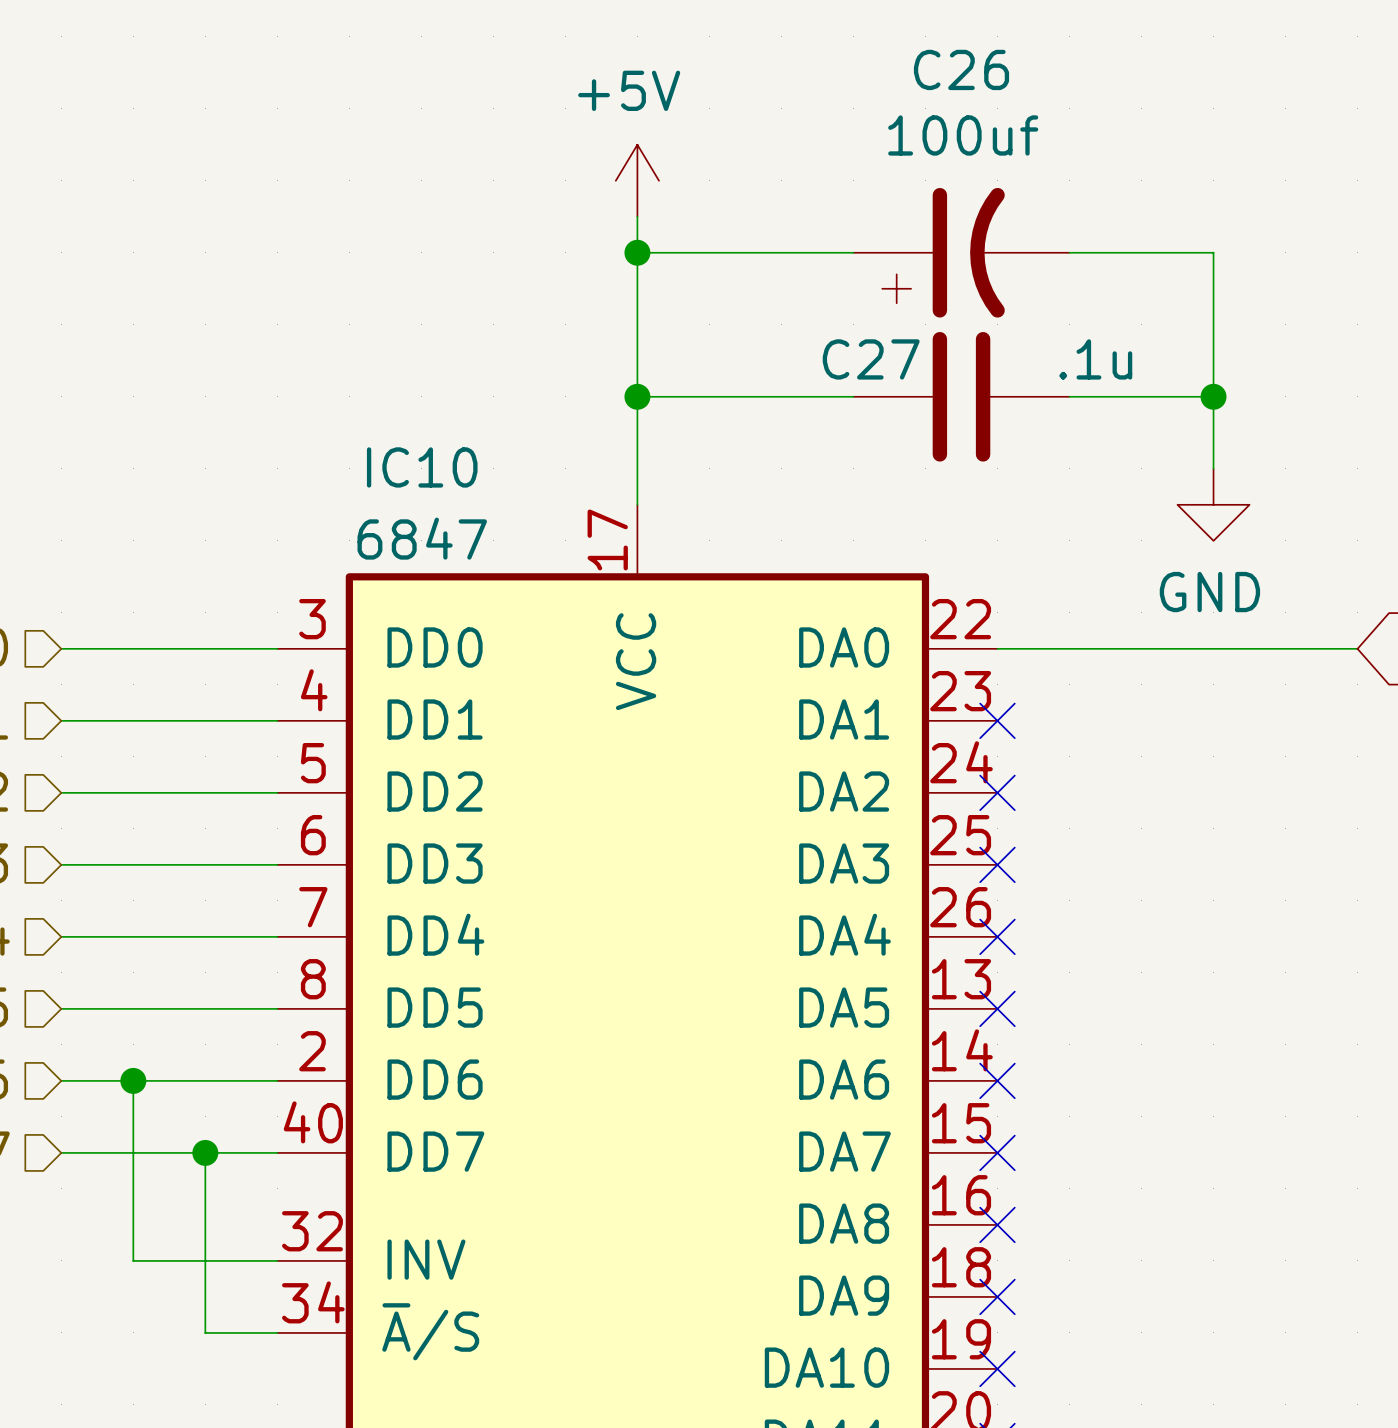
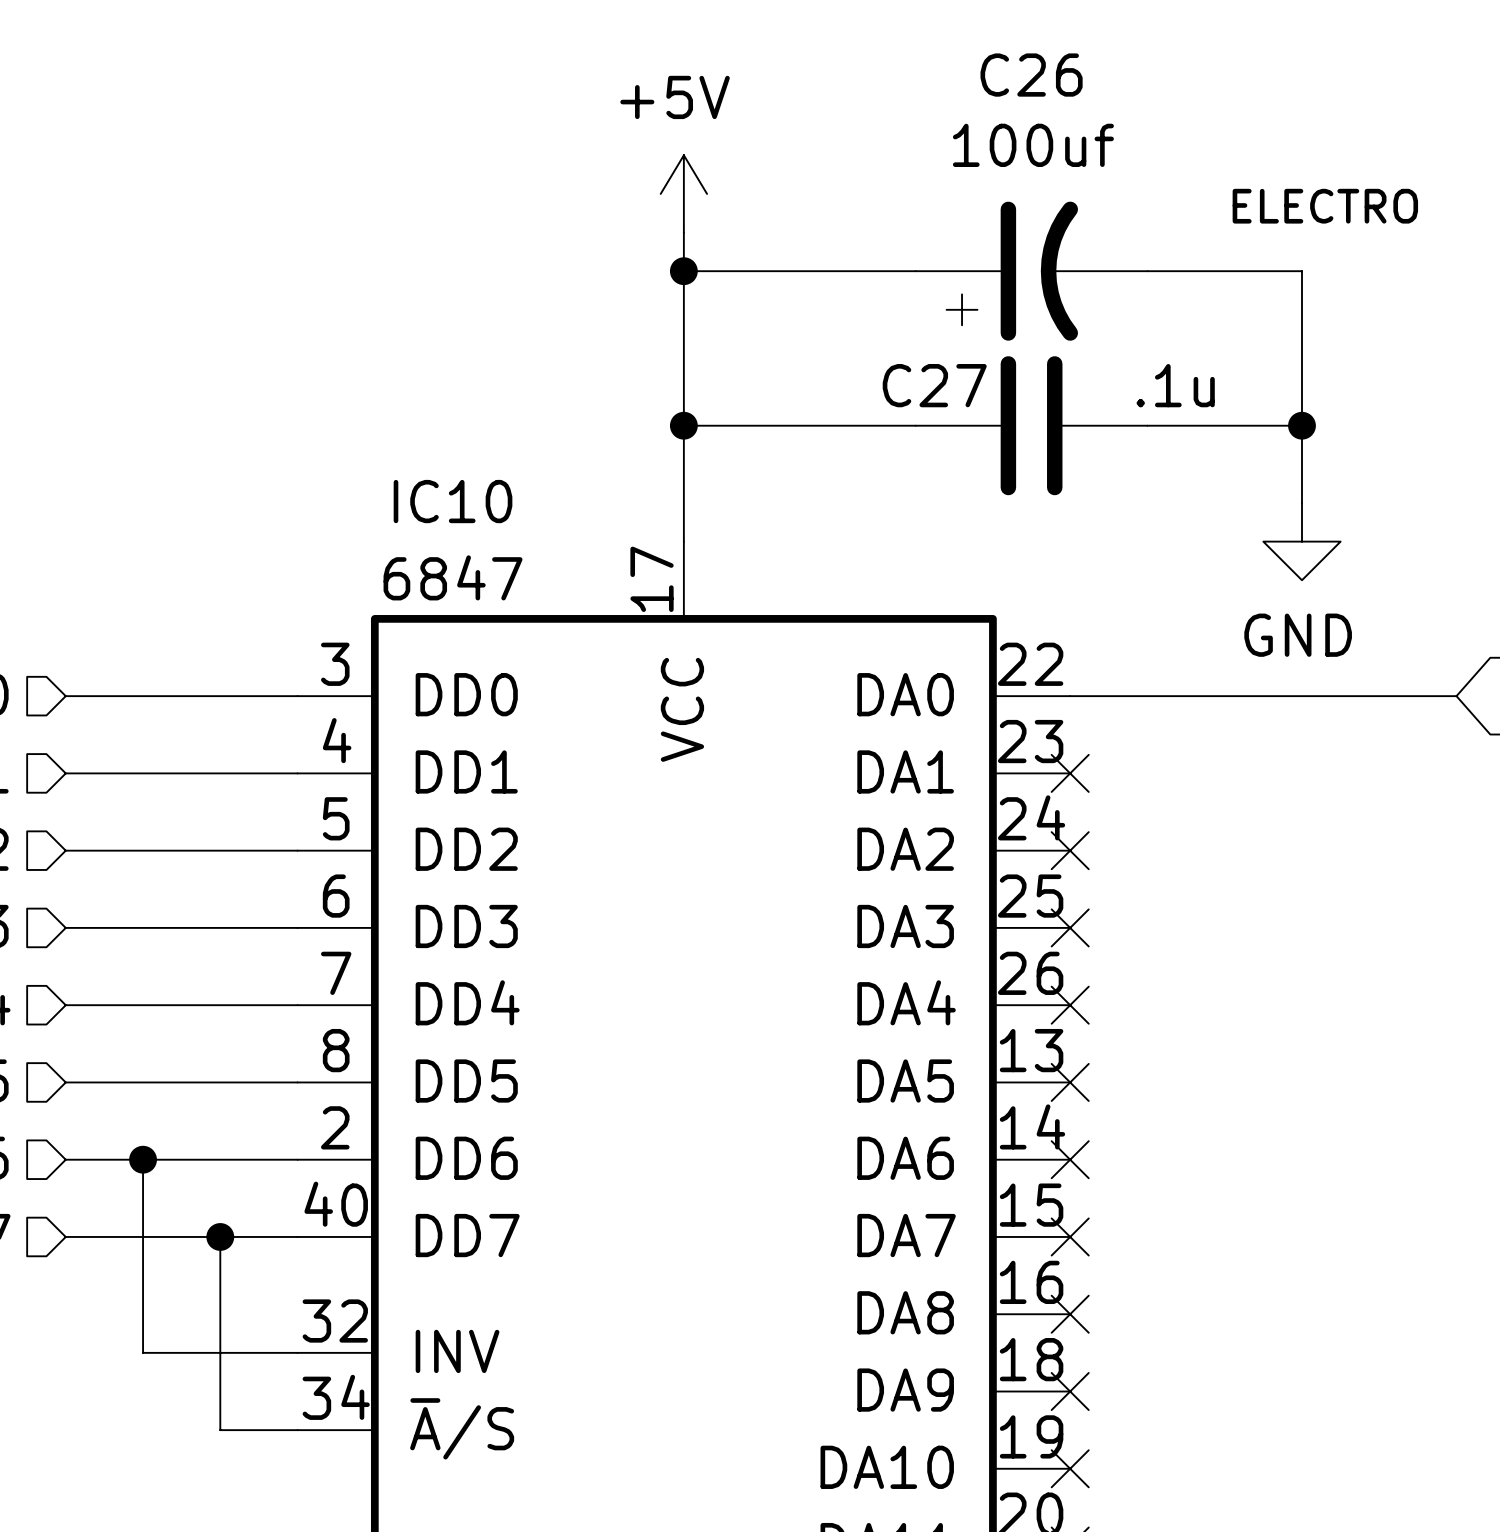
text: none -> ELECTRO (1325, 206)

